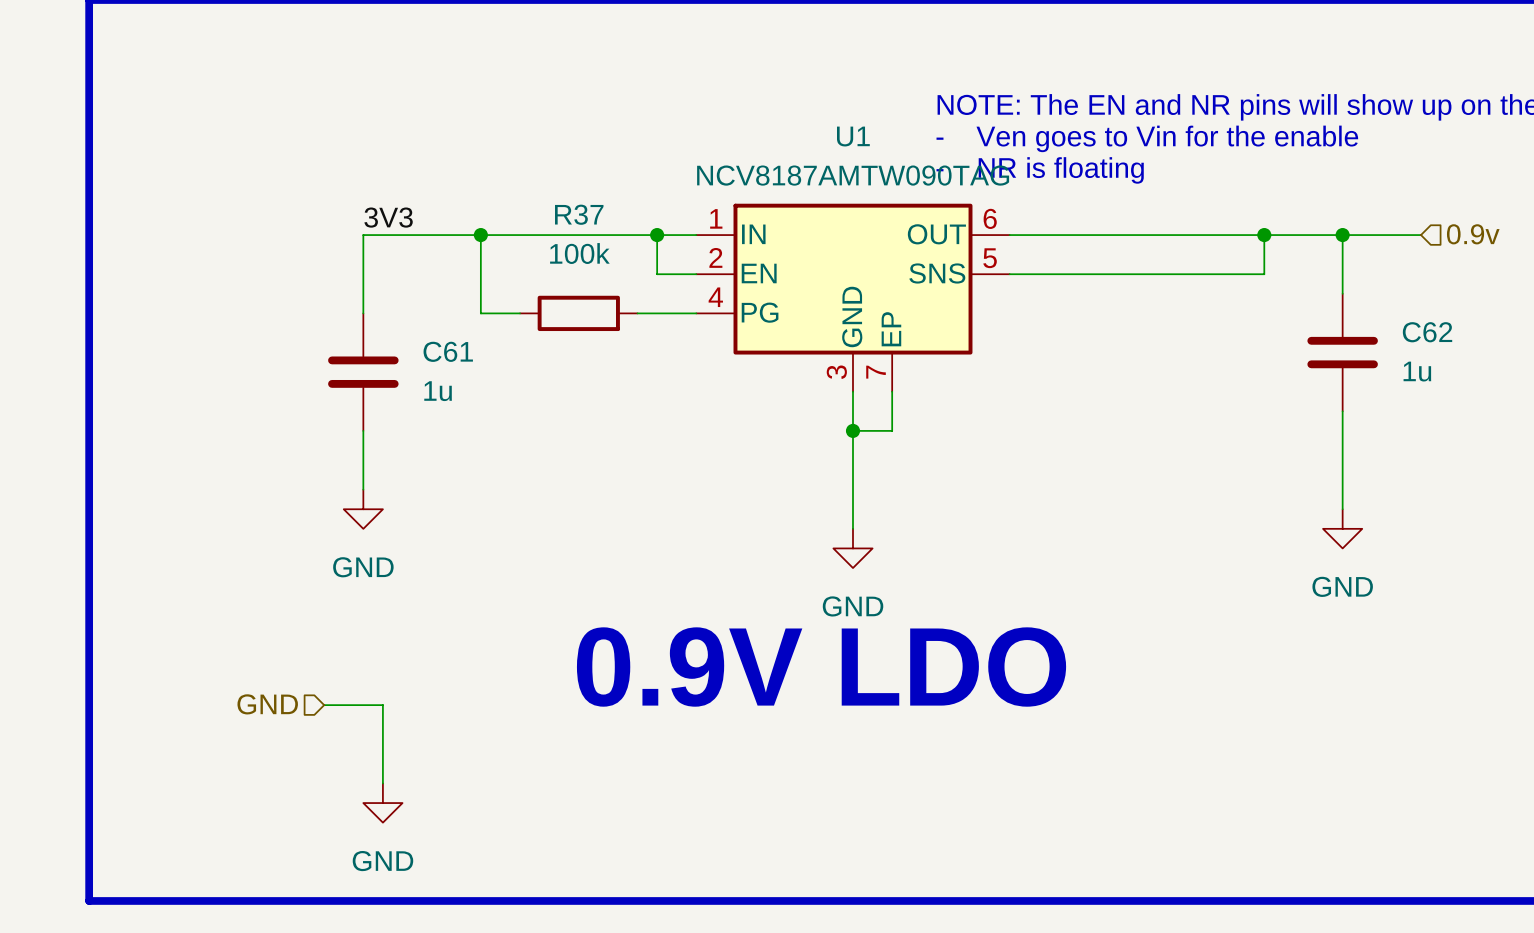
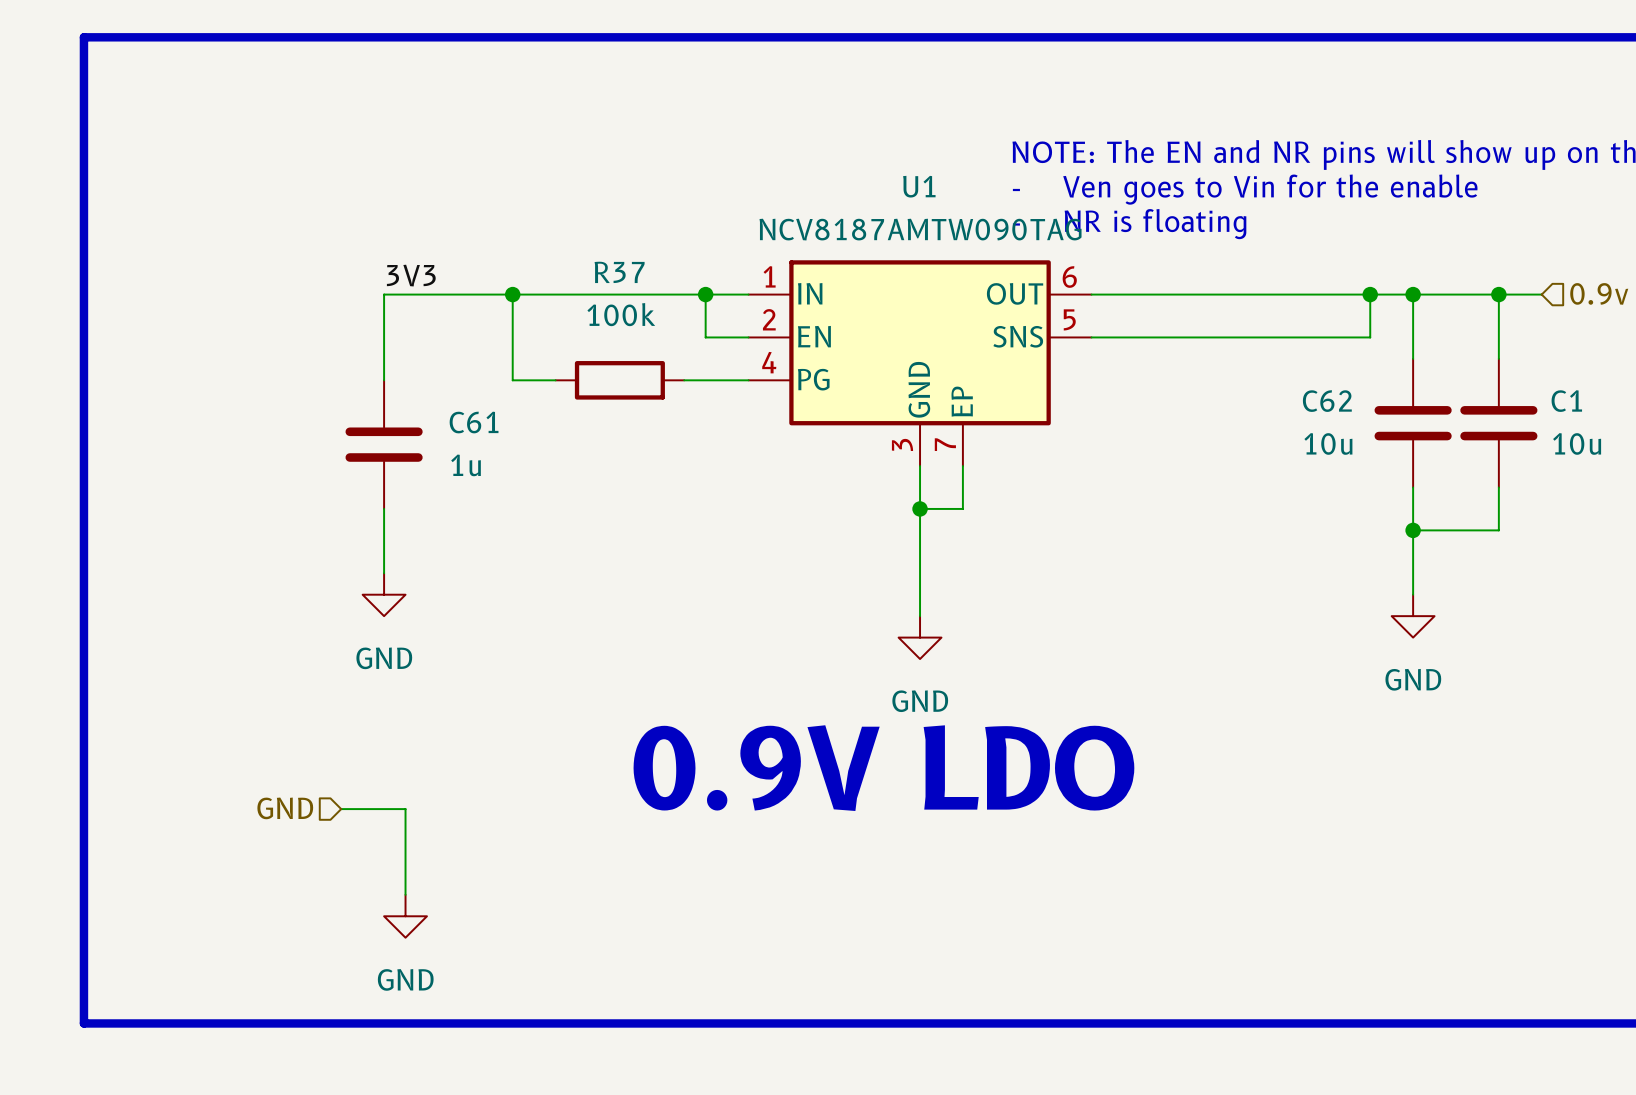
junction: none -> (1413, 294)
wire: (1342, 235) (1342, 293) -> (1413, 294) (1413, 358)
junction: (1342, 235) -> none
wire: none -> (1498, 294) (1498, 358)
junction: none -> (1498, 294)
C62 name position: C62 (1427, 332) -> C62 (1327, 401)
C62 position: (1342, 352) -> (1413, 423)
C1: none -> 10u (1498, 423)
C62 value: 1u (1417, 371) -> 10u (1328, 443)
wire: (1342, 411) (1342, 509) -> (1413, 487) (1413, 594)
wire: none -> (1498, 487) (1498, 530) (1413, 530)
junction: none -> (1413, 530)
power symbol position: GND (1342, 528) -> GND (1413, 616)

